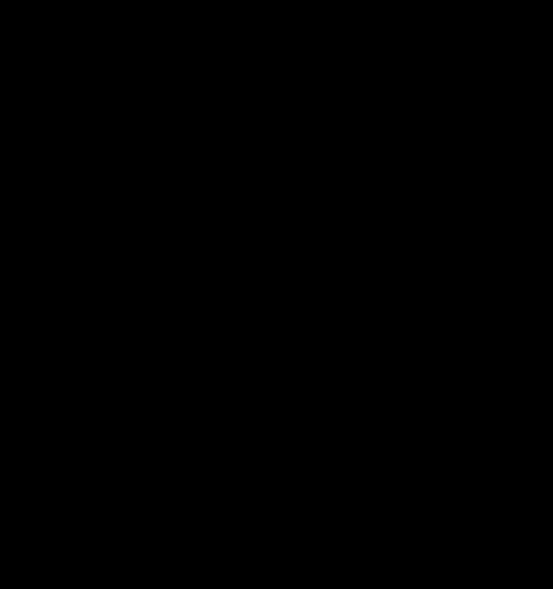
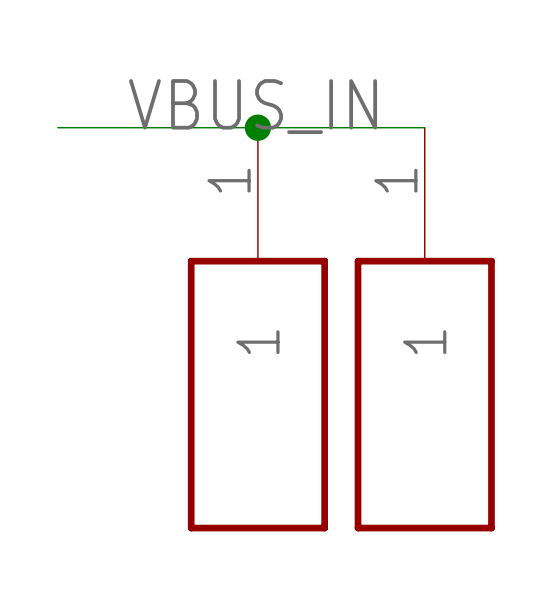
label: none -> VBUS_IN (253, 106)
wire: none -> (57, 127) (424, 127)
junction: none -> (257, 127)
part: none -> (257, 329)
part: none -> (424, 329)

